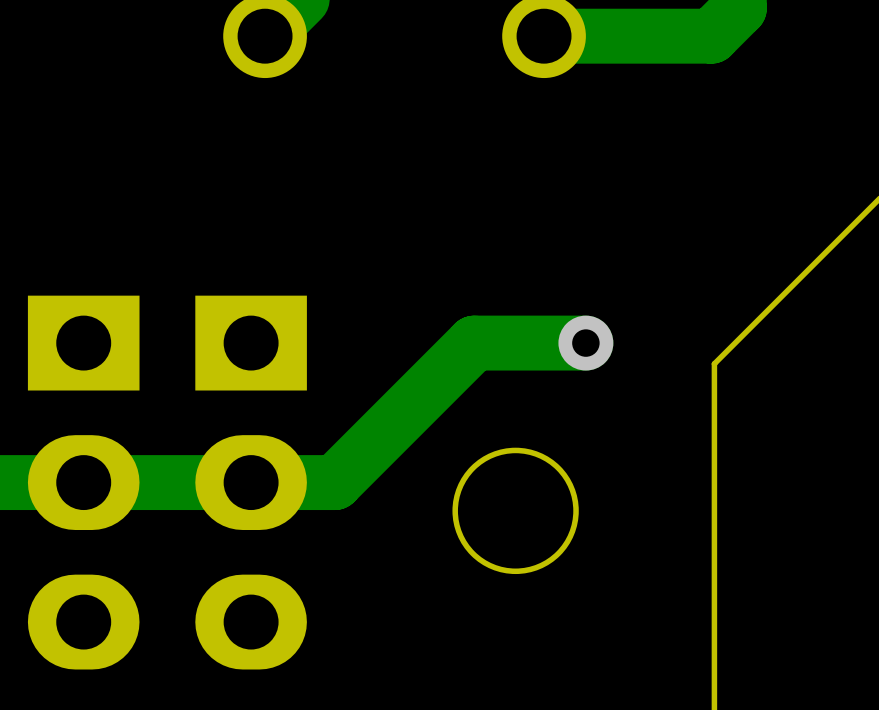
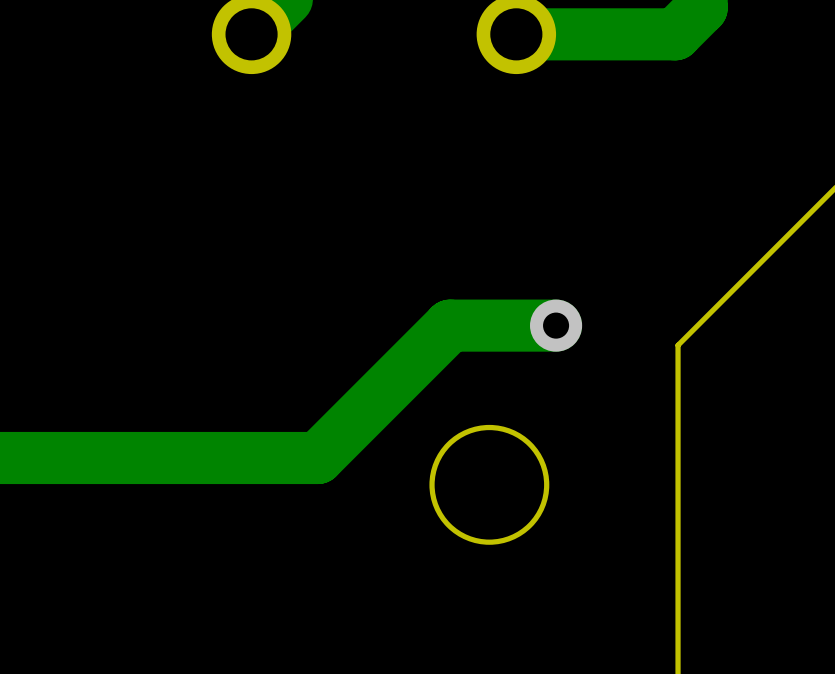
part: (83, 482) -> none
part: (251, 482) -> none

